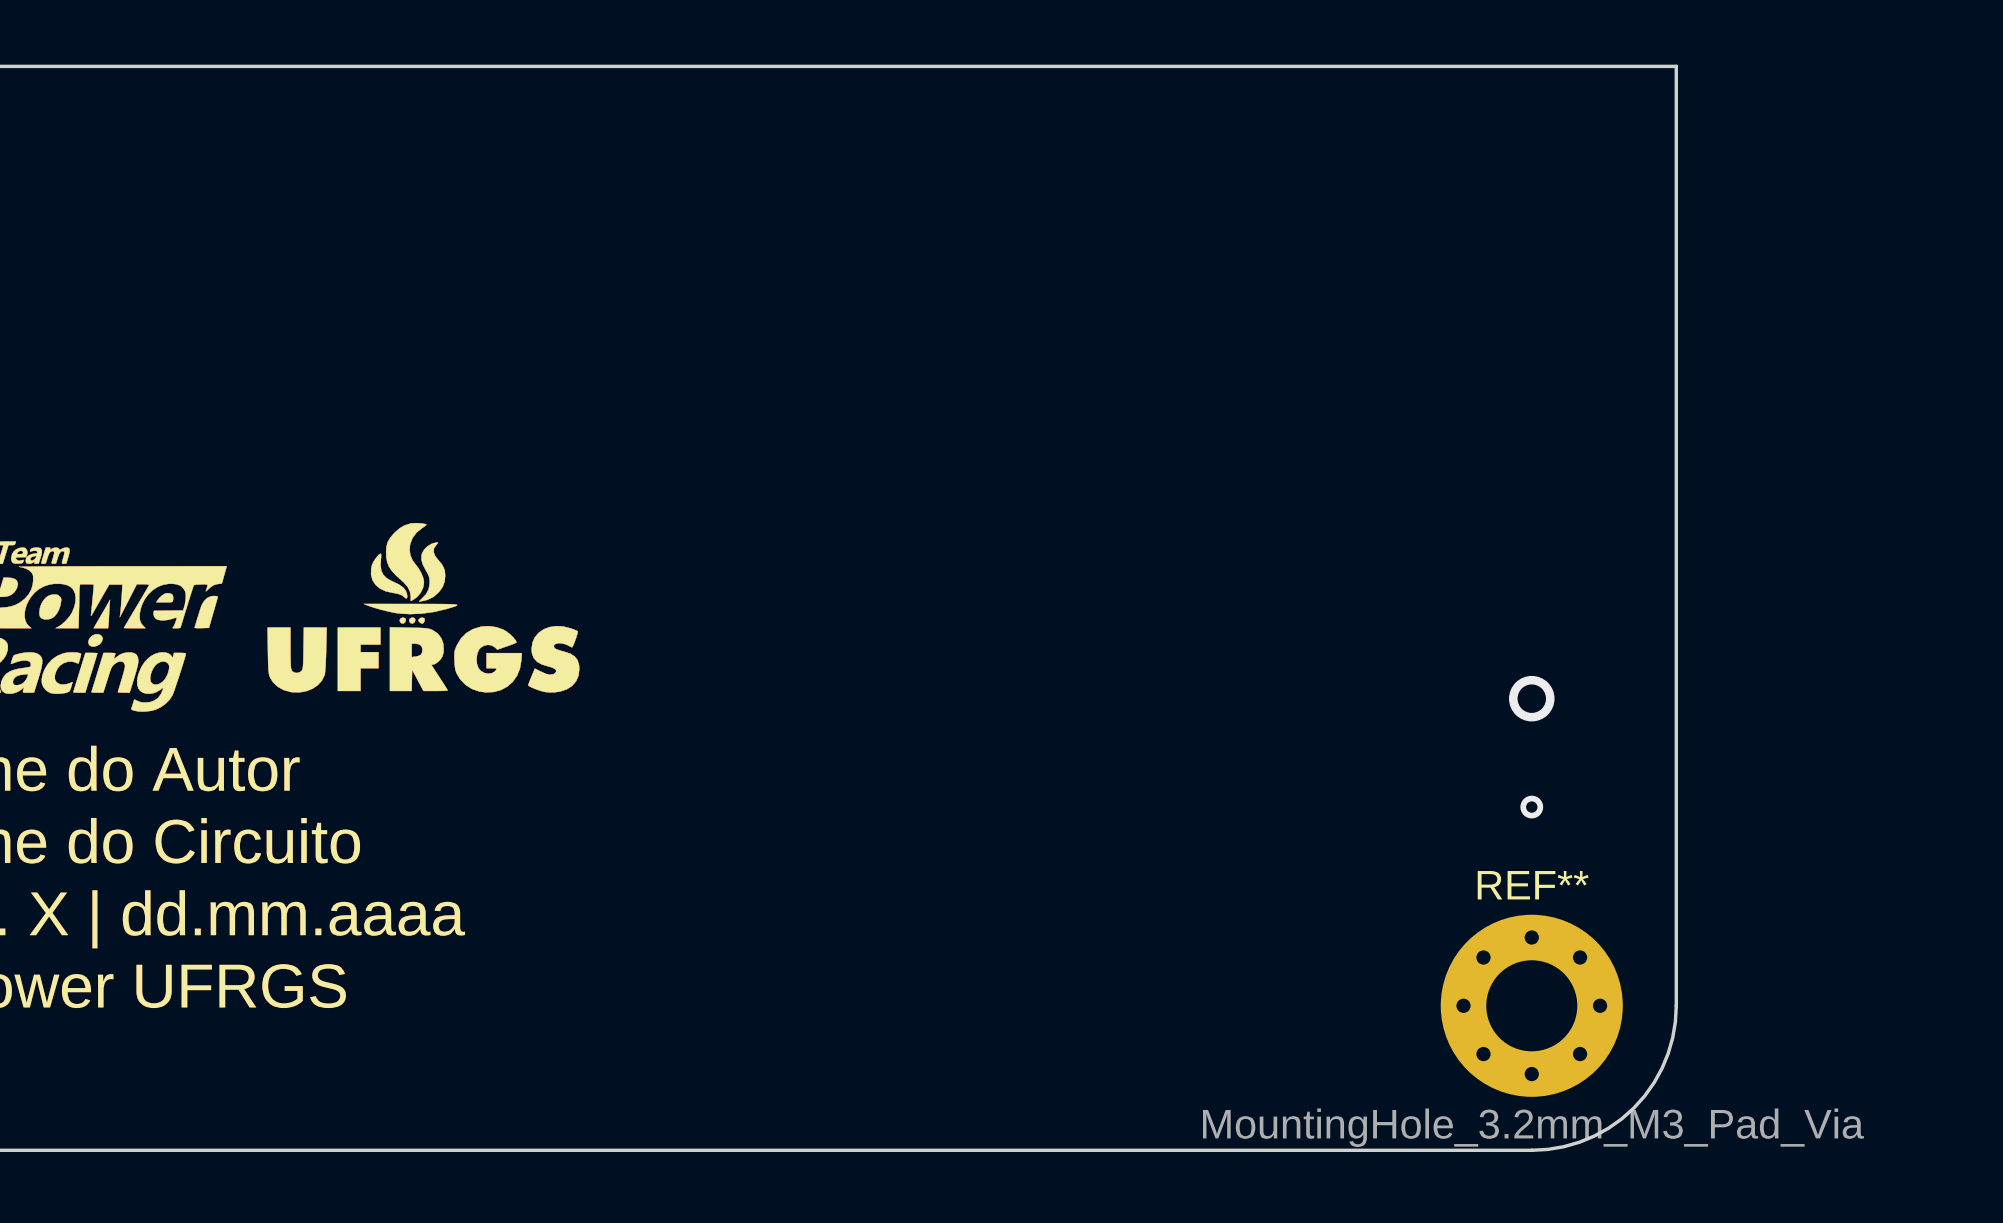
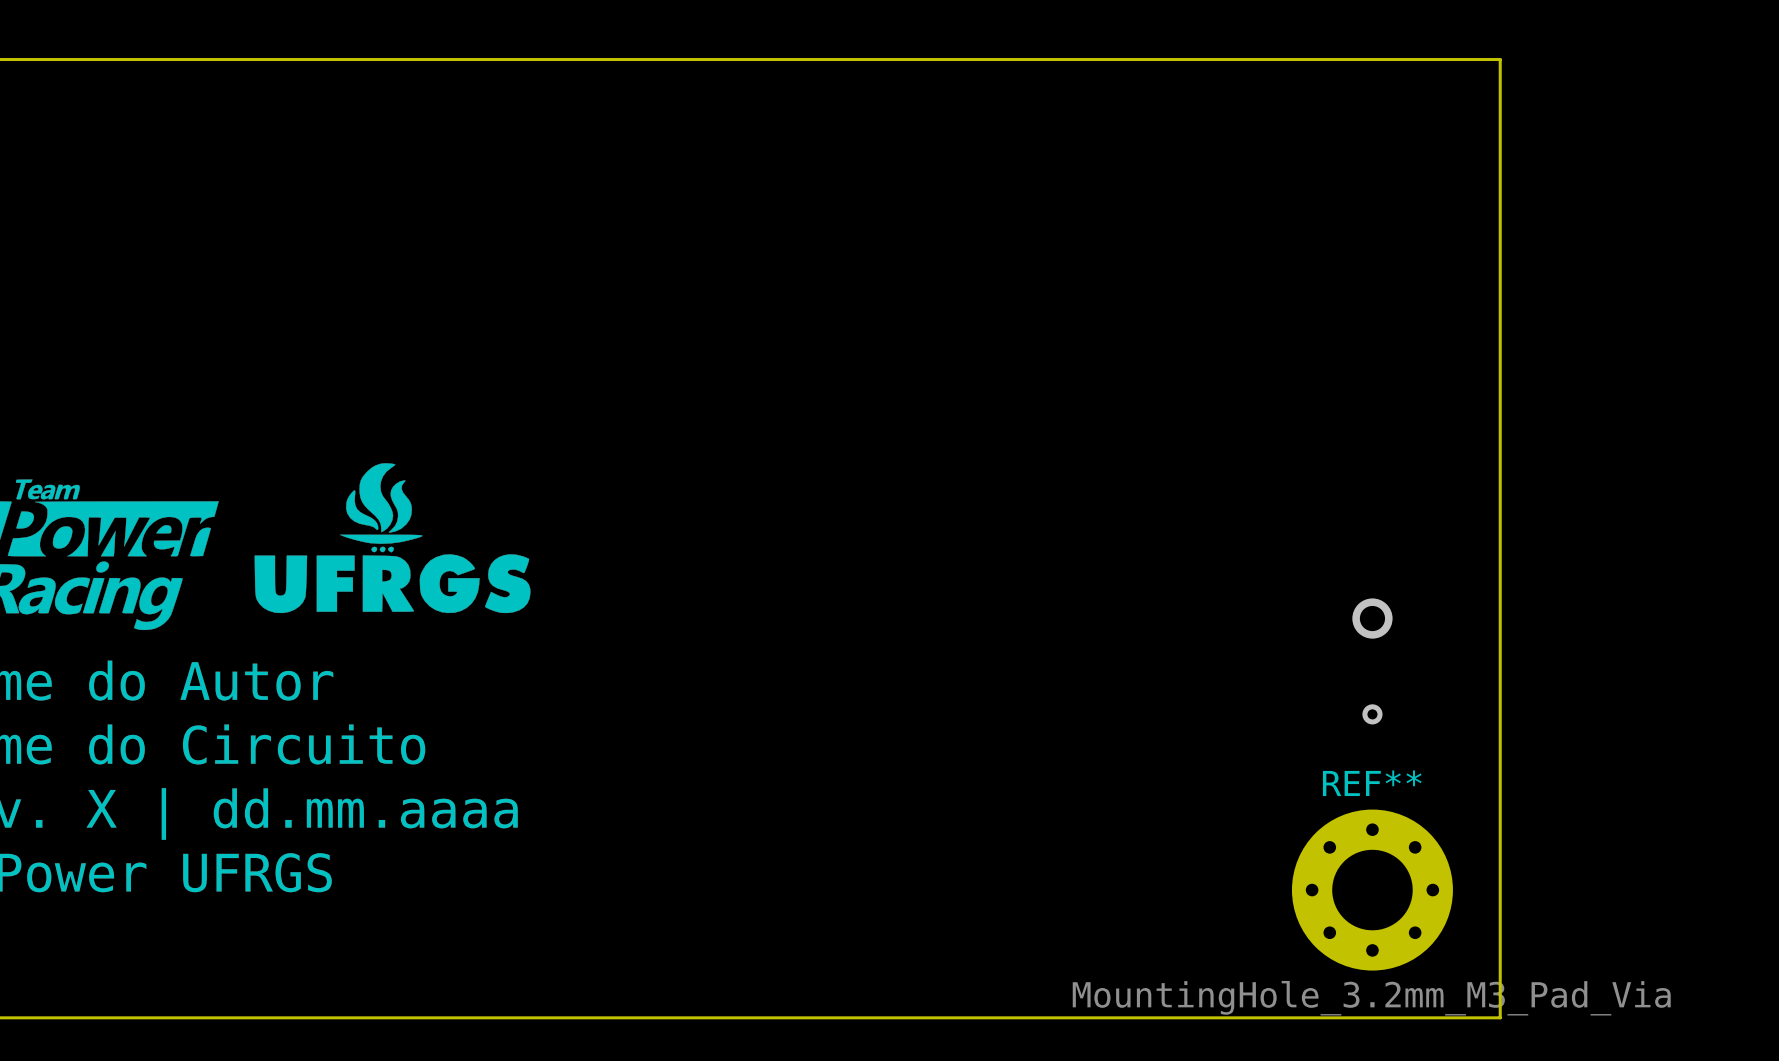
board edge: (1676, 1005) (1672, 1037) (1661, 1068) (1654, 1082) (1633, 1107) (1608, 1128) (1579, 1142) (1563, 1146) (1531, 1150) -> (1500, 890) (1500, 1017) (1372, 1017)

